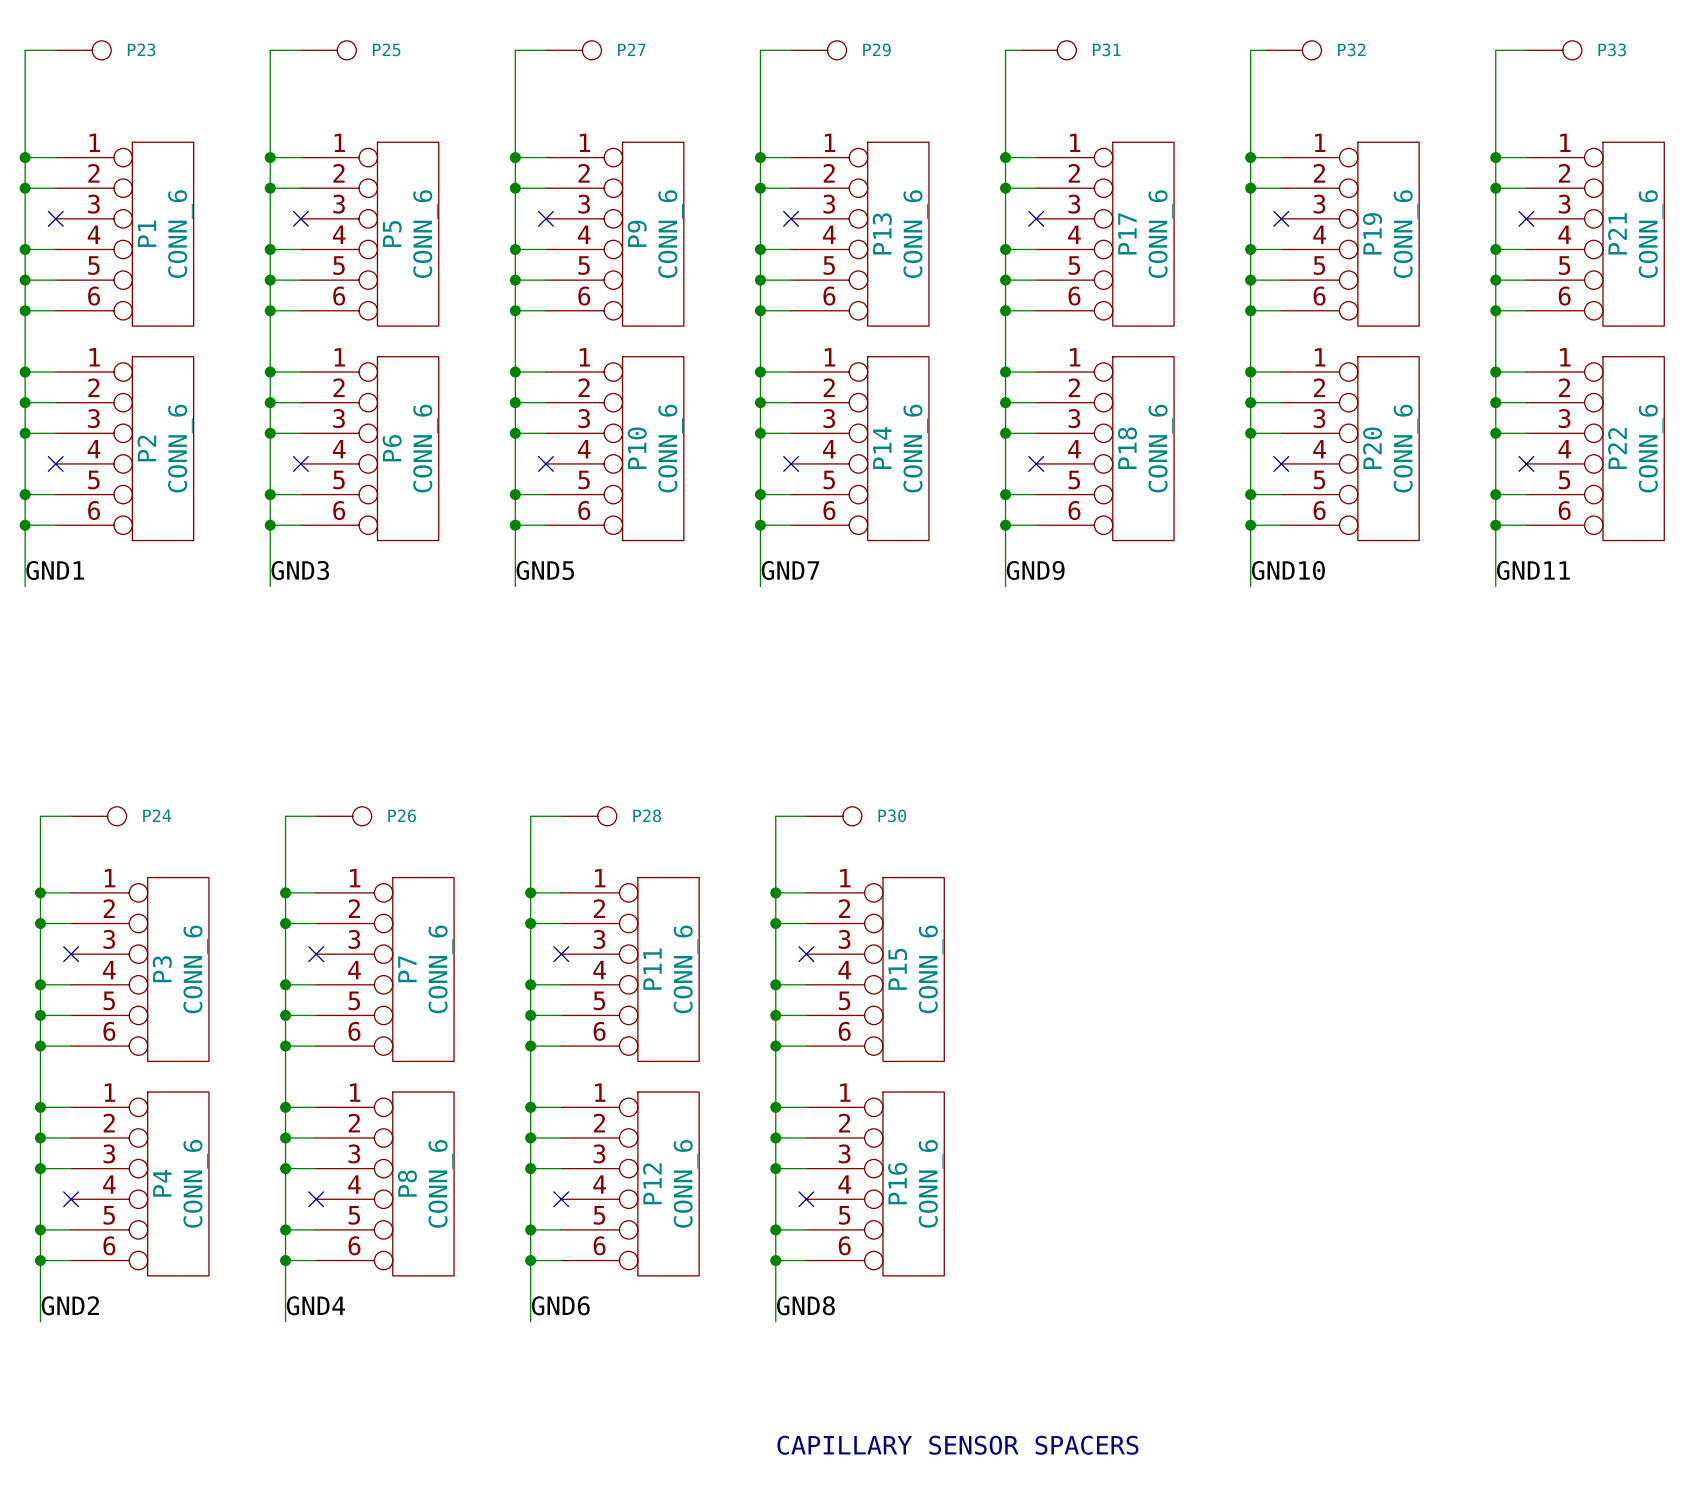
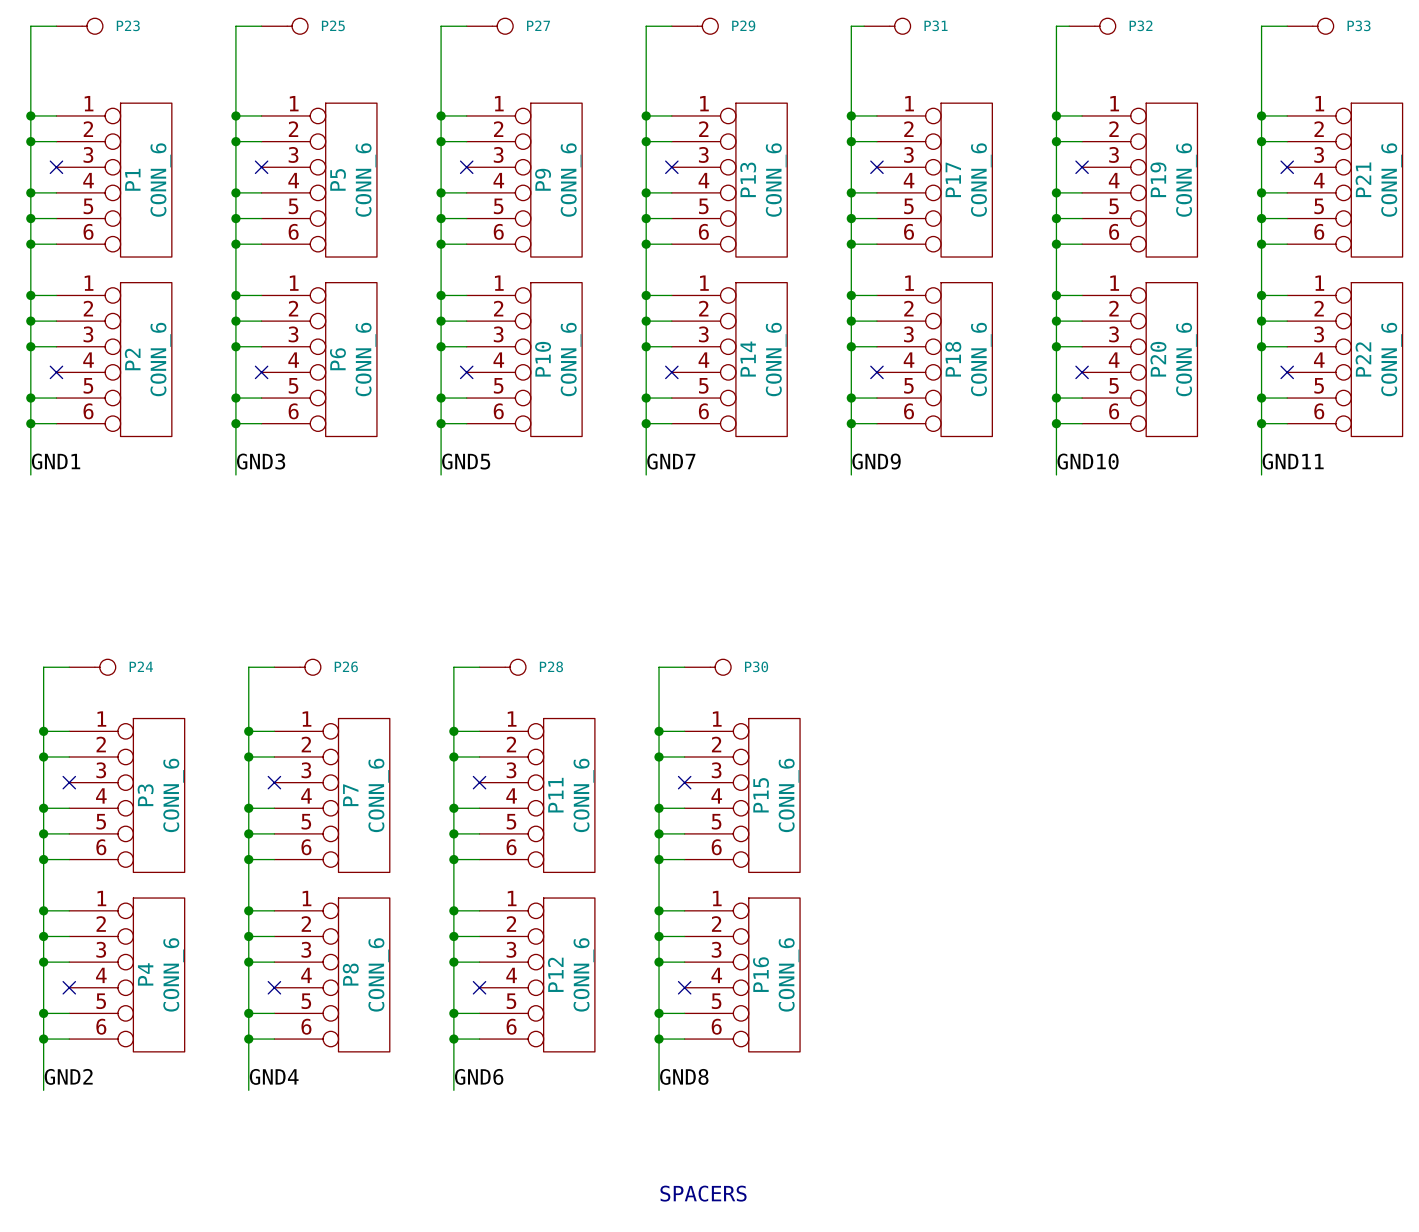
text: CAPILLARY SENSOR SPACERS (957, 1445) -> SPACERS (703, 1193)

